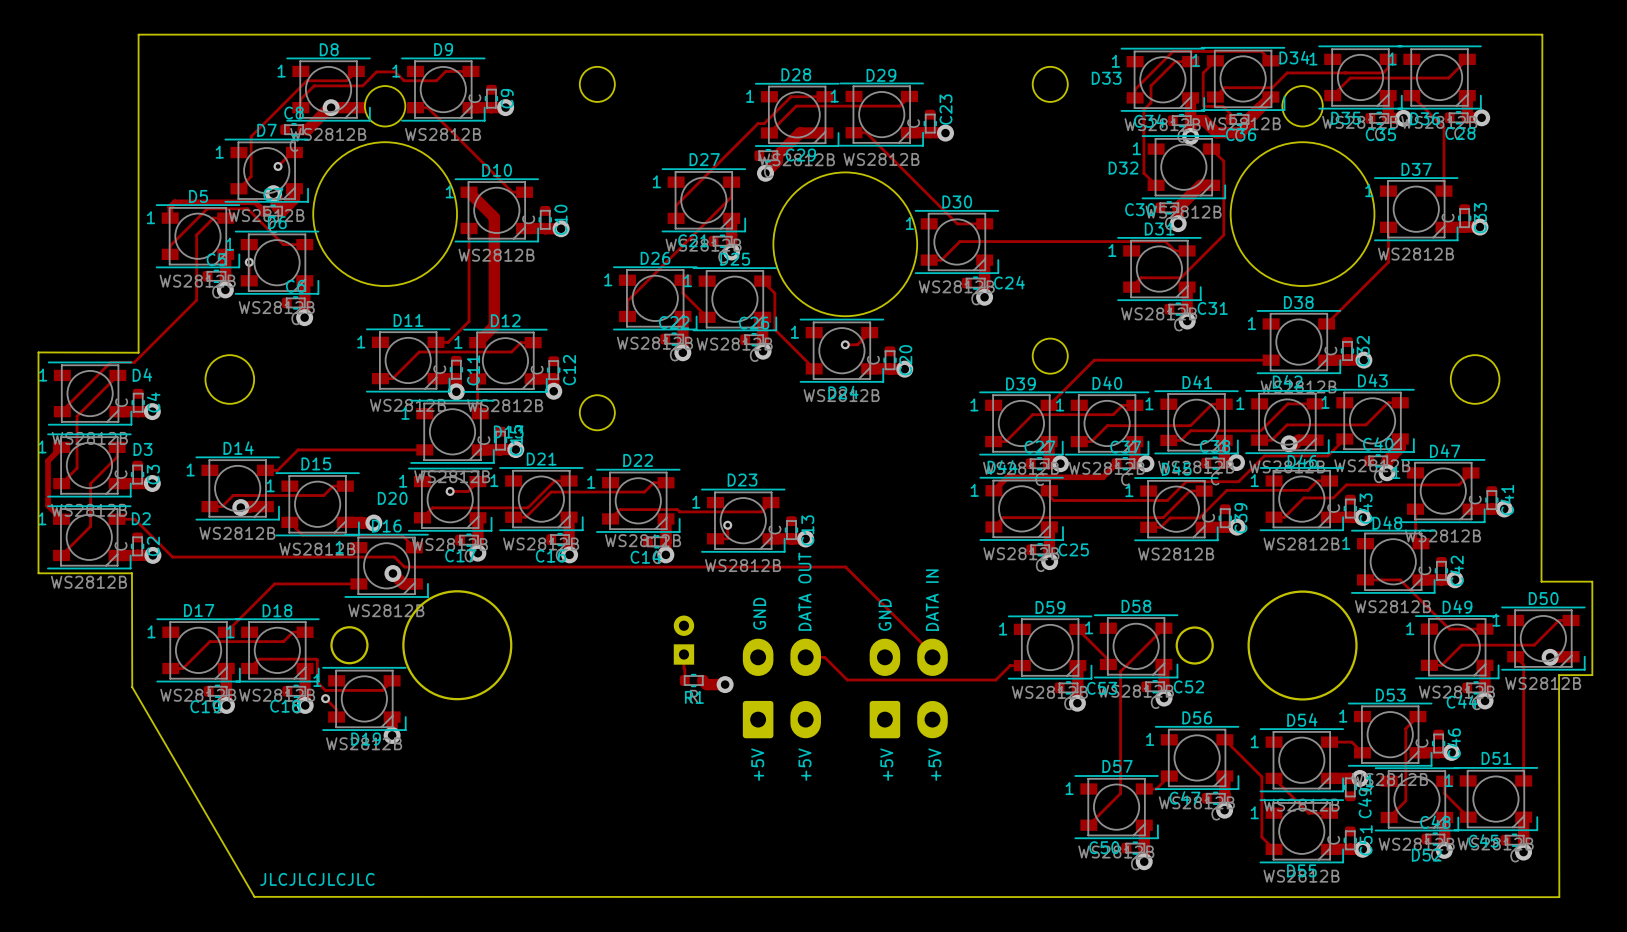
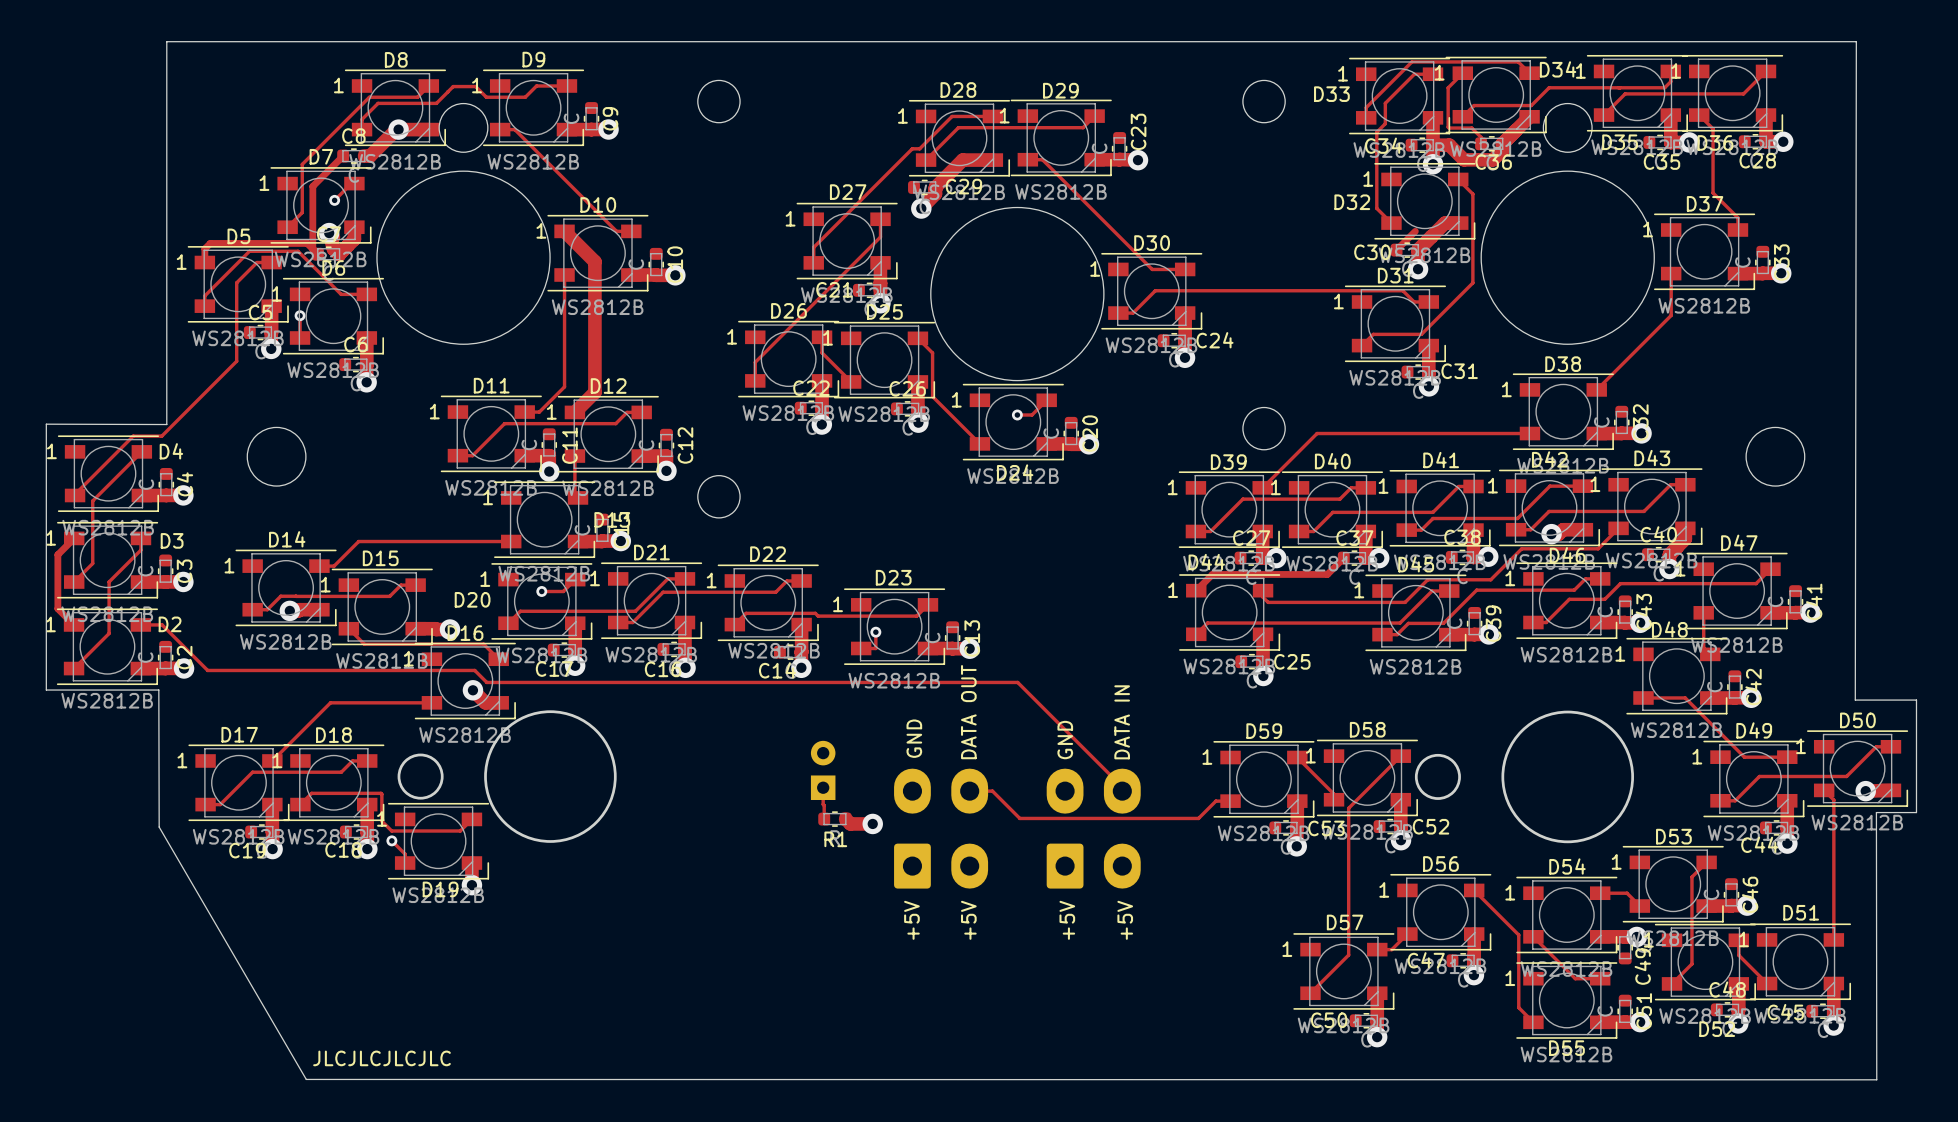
track: (1423, 107) (1444, 127) (1444, 181) -> (1713, 128) (1713, 192) (1737, 217)
track: none -> (343, 156) (312, 186) (312, 249)
track: none -> (1415, 231) (1396, 250)

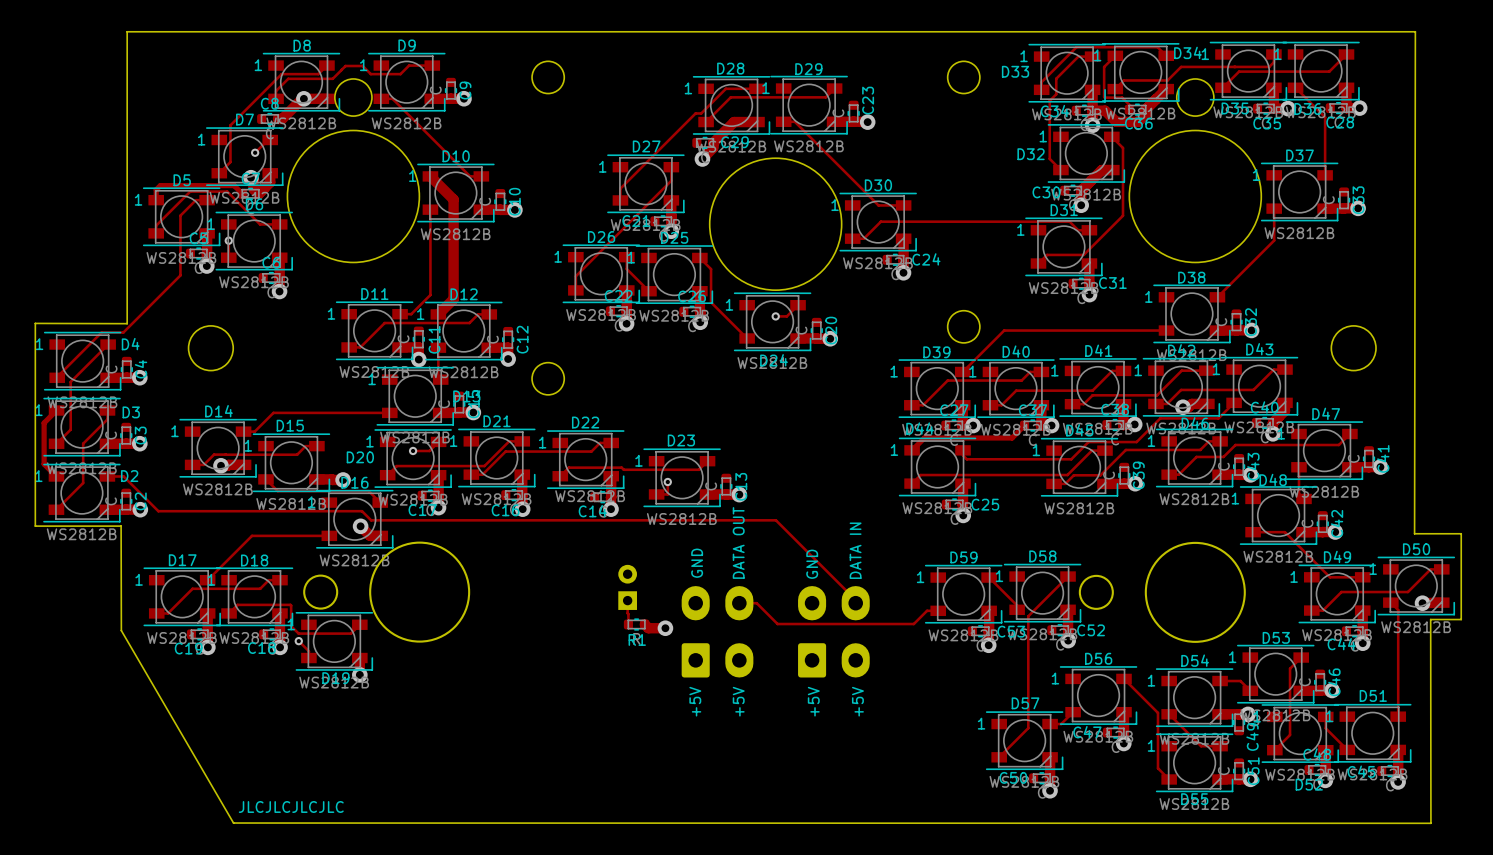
track: (1713, 128) (1713, 192) (1737, 217) -> (1306, 98) (1325, 117) (1325, 166)
track: (343, 156) (312, 186) (312, 249) -> none
track: (1415, 231) (1396, 250) -> none

